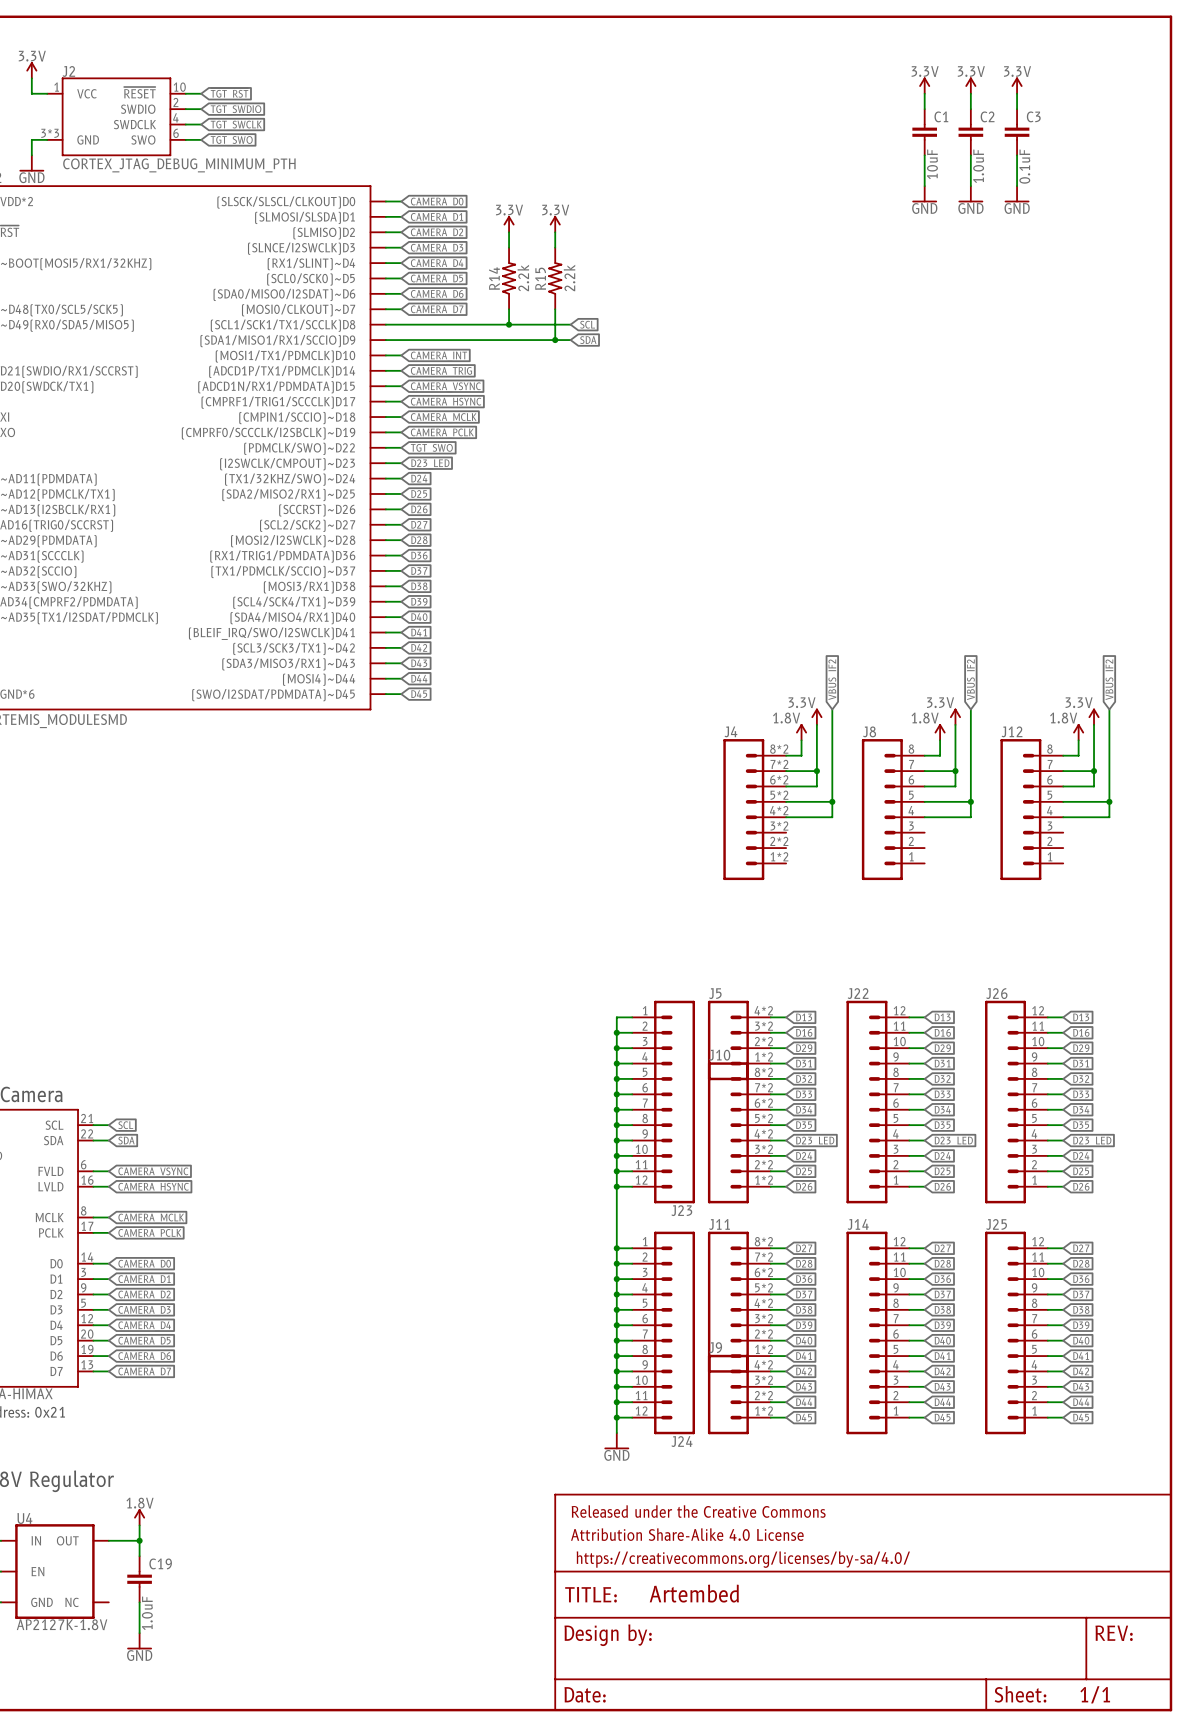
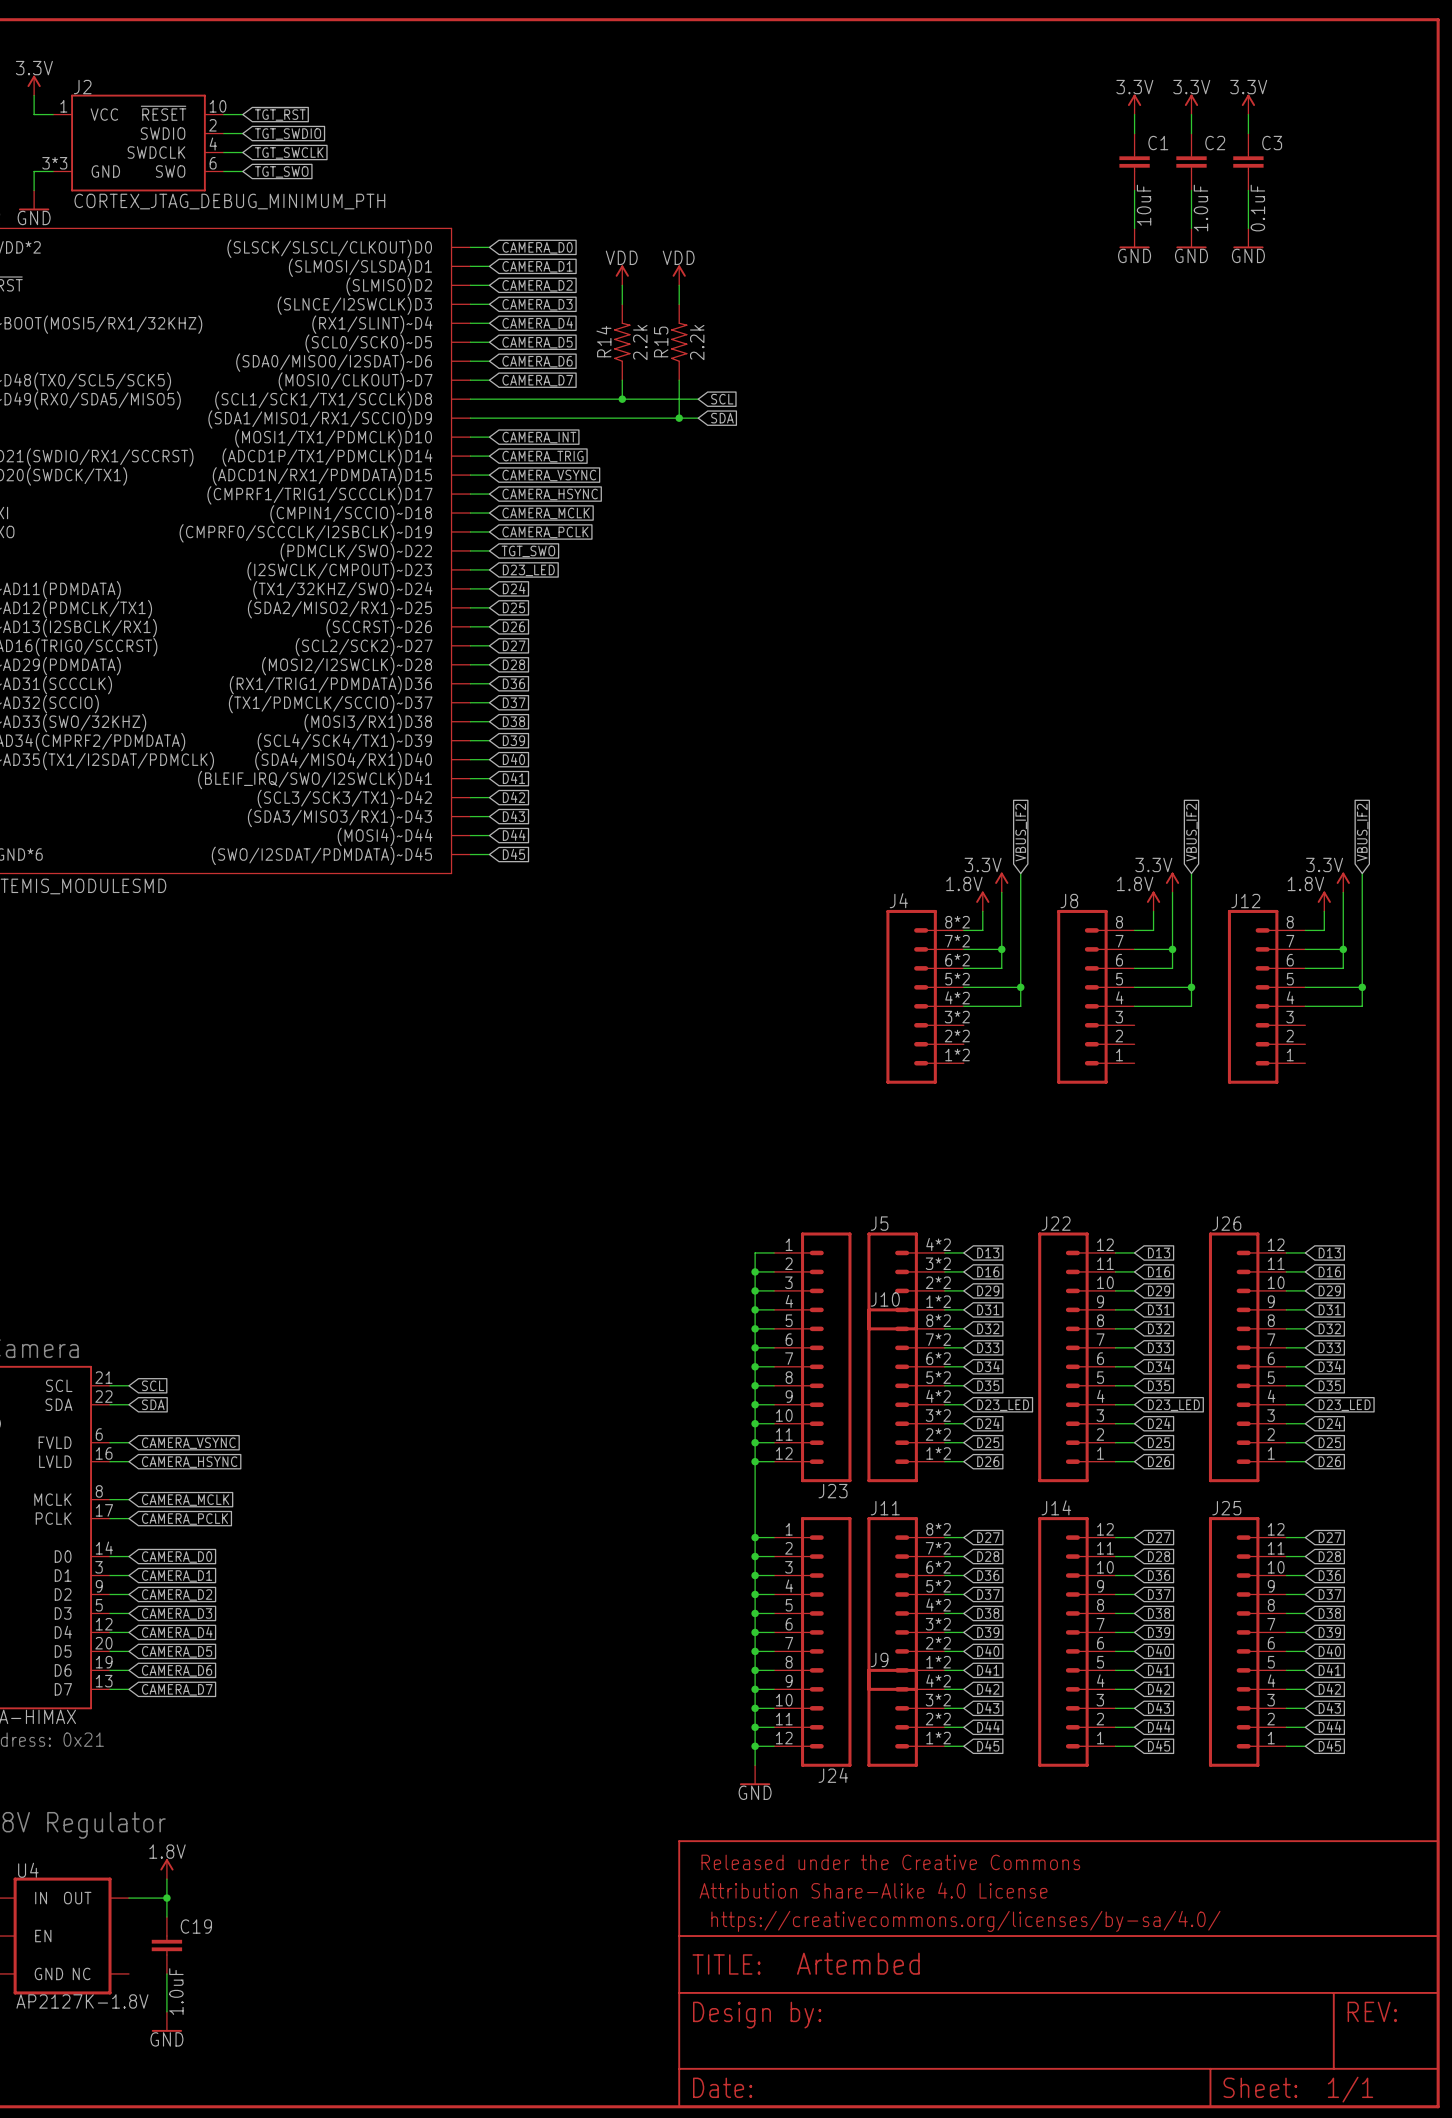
power symbol: 3.3V (509, 224) -> VDD (622, 275)
power symbol: 3.3V (555, 224) -> VDD (679, 275)

